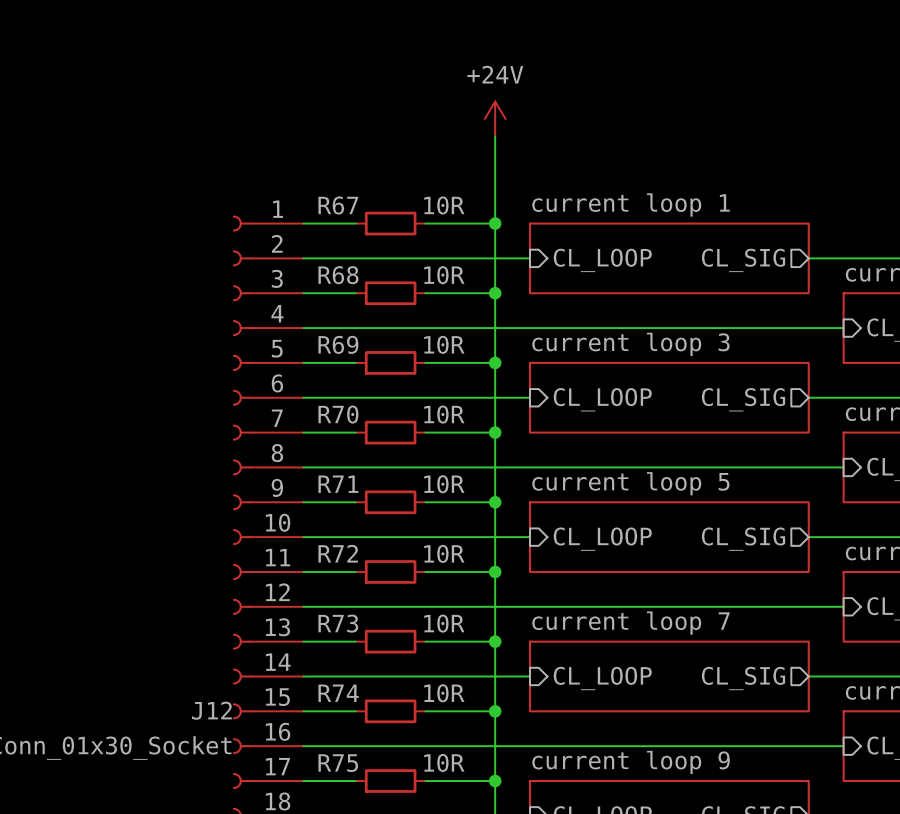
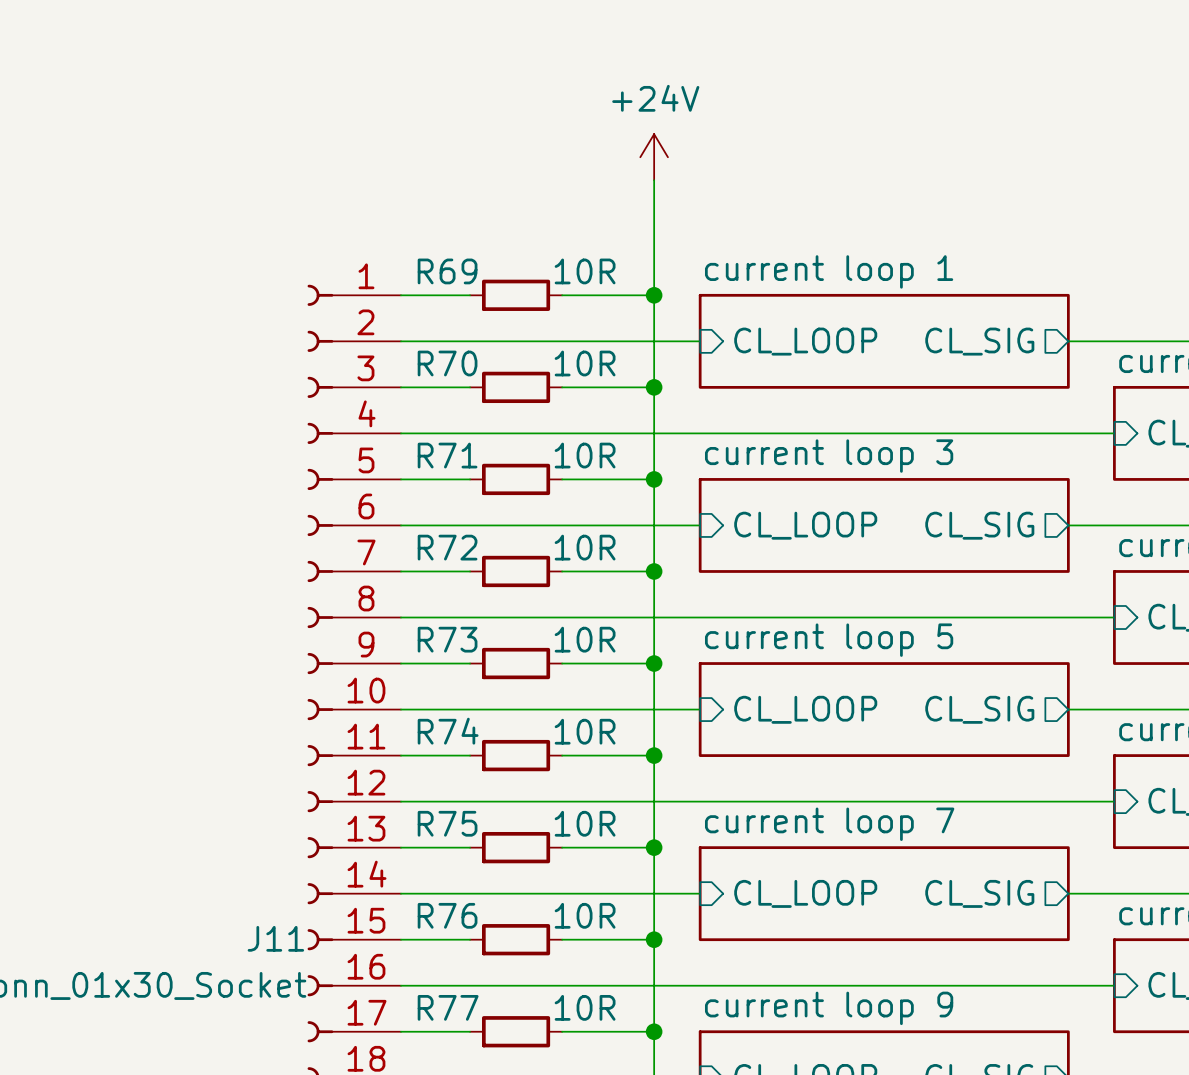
R67 name: R67 (338, 205) -> R69 (447, 271)
R68 name: R68 (338, 275) -> R70 (447, 363)
R69 name: R69 (338, 344) -> R71 (447, 455)
R70 name: R70 (338, 414) -> R72 (447, 547)
R71 name: R71 (338, 484) -> R73 (447, 639)
R72 name: R72 (338, 553) -> R74 (448, 731)
R73 name: R73 (338, 623) -> R75 (447, 823)
R74 name: R74 (338, 693) -> R76 (447, 915)
J12 name: J12 (211, 710) -> J11 (275, 938)
R75 name: R75 (338, 763) -> R77 (448, 1007)

